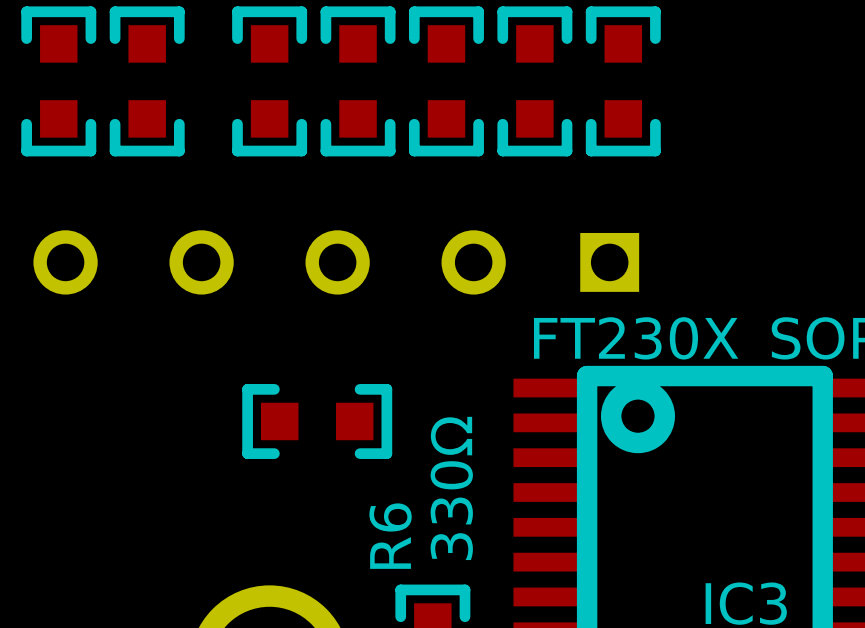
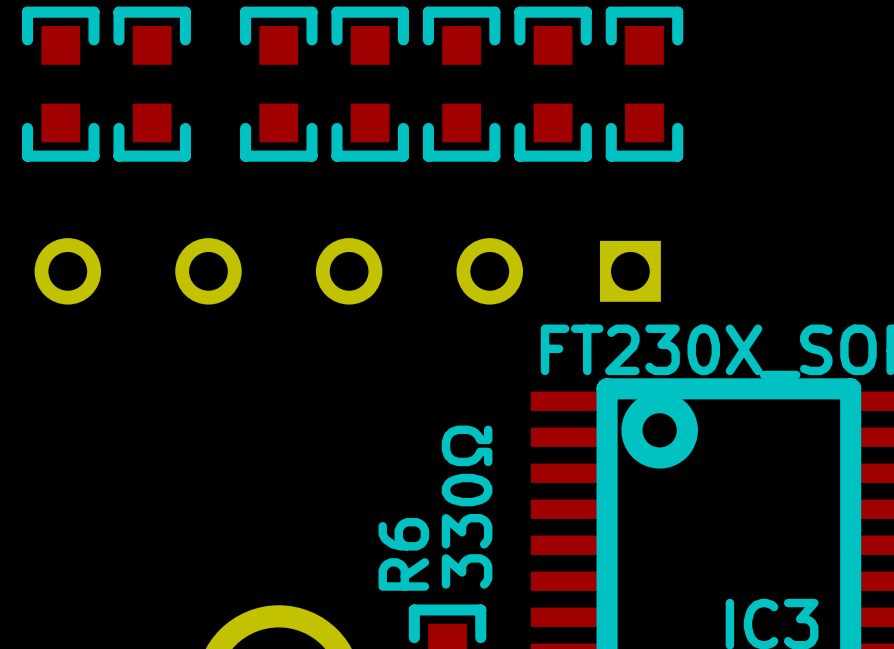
part: (317, 421) -> none

